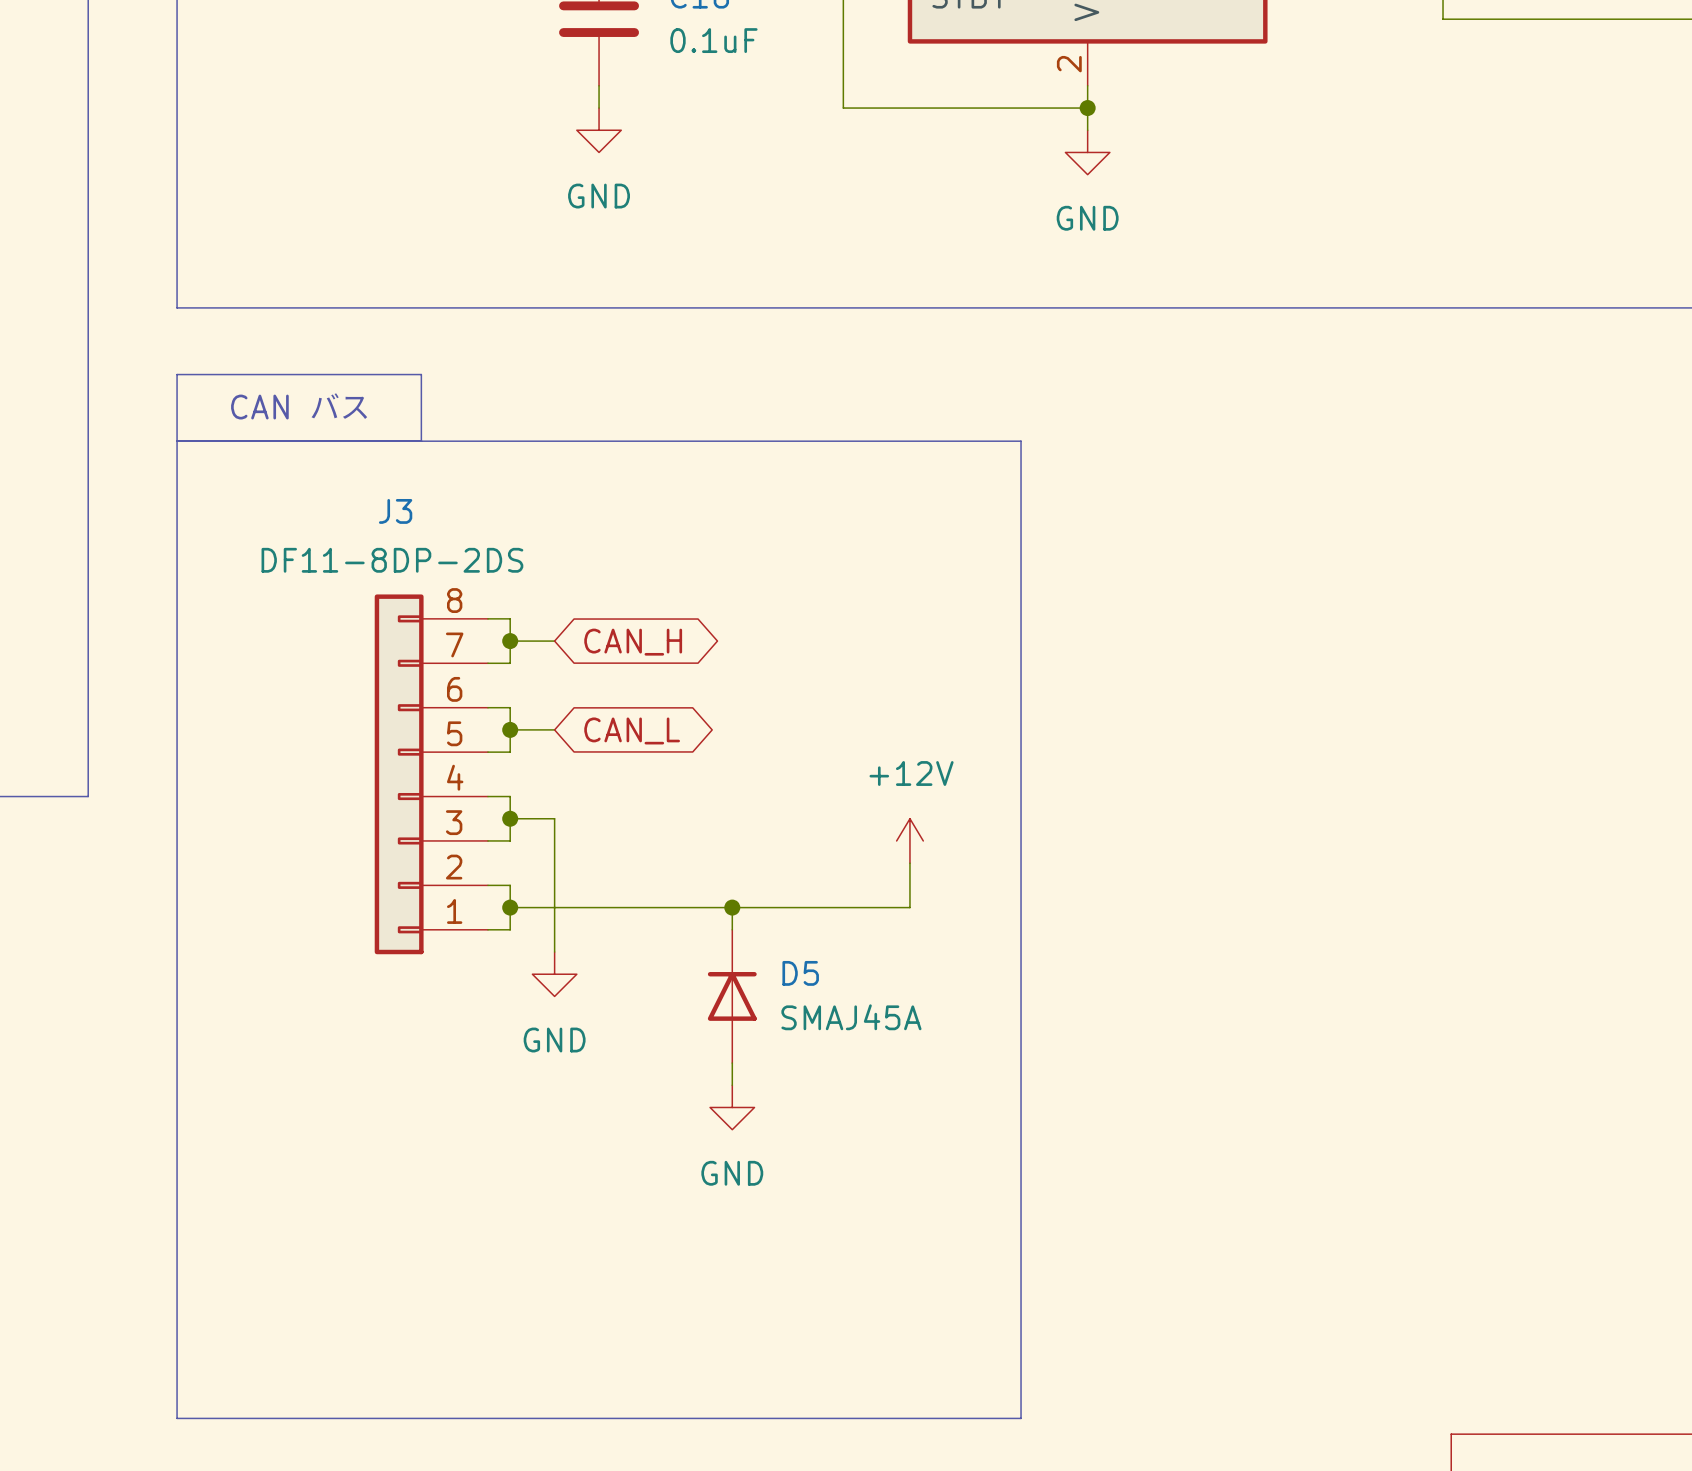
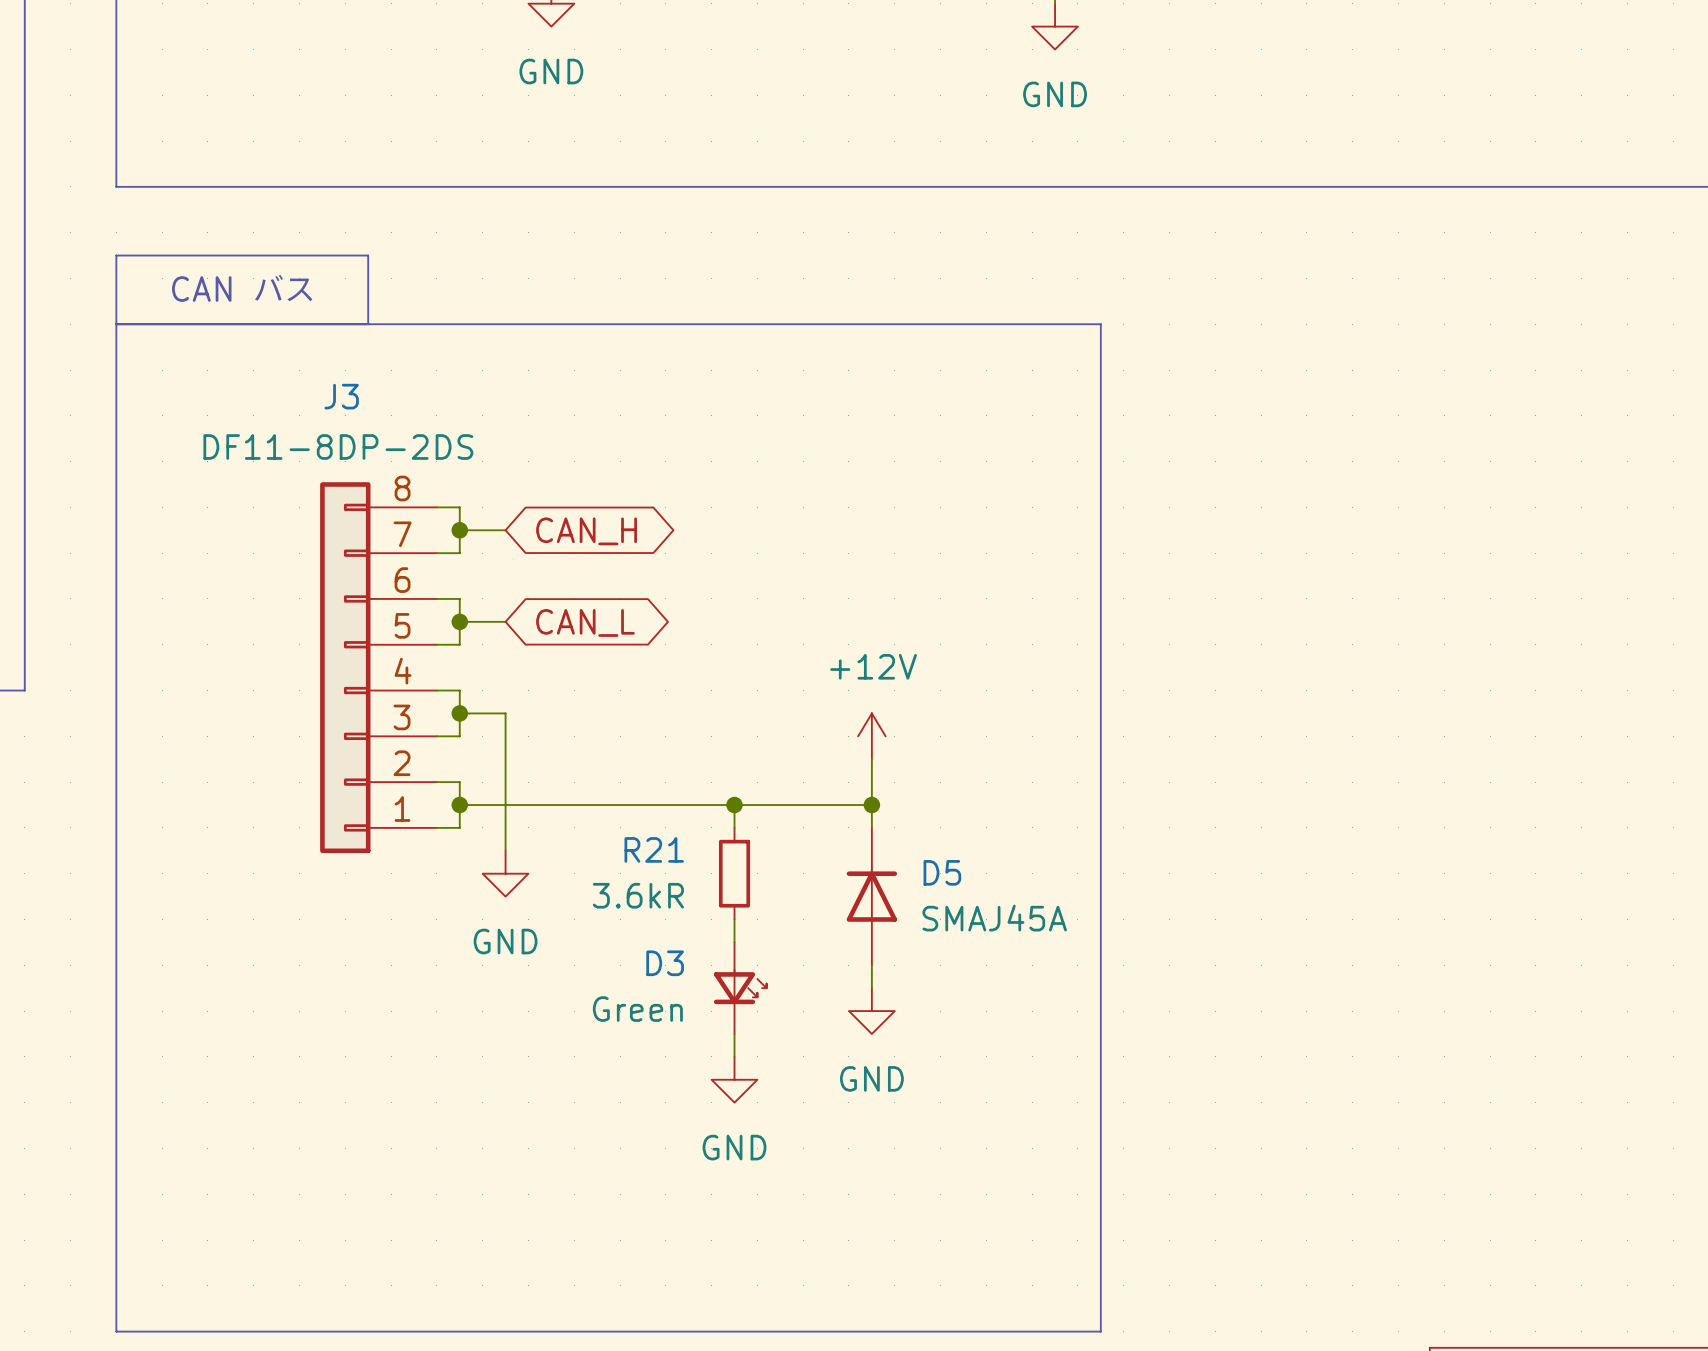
line: (1021, 441) (1021, 1418) -> (986, 324) (1100, 324) (1100, 1331) (986, 1331)
wire: (732, 907) (732, 929) -> (871, 805) (871, 827)
junction position: (732, 907) -> (734, 805)
wire: none -> (734, 805) (734, 827)
junction: none -> (871, 805)
R21: none -> 3.6kR (734, 873)
D5 position: (732, 996) -> (871, 896)
wire: none -> (734, 919) (734, 942)
wire: (732, 1063) (732, 1085) -> (871, 965) (871, 988)
D3: none -> Green (740, 988)
power symbol position: GND (732, 1107) -> GND (734, 1079)
power symbol: none -> GND (871, 1011)
wire: none -> (734, 1033) (734, 1056)

